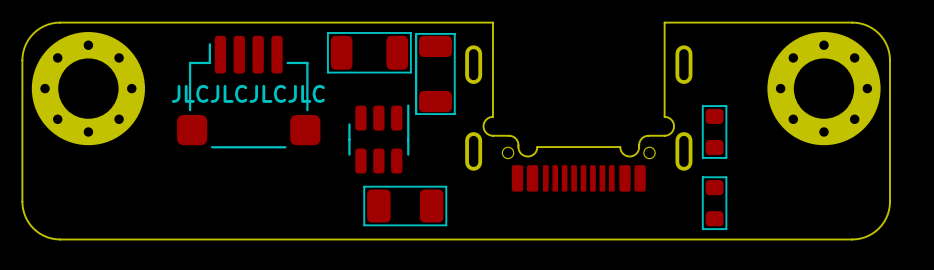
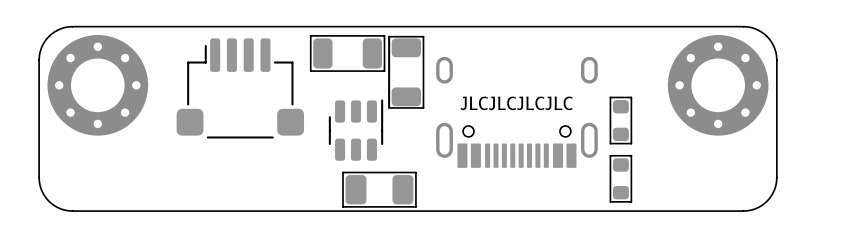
board edge: none -> (457, 26) (610, 26)
board edge: (814, 22) (852, 22) (864, 24) (878, 33) (889, 51) (889, 206) (886, 218) (878, 228) (860, 238) (60, 239) (43, 235) (30, 225) (23, 210) (22, 192) -> (743, 26) (754, 28) (767, 36) (773, 45) (776, 60) (776, 185) (767, 201) (750, 210) (72, 211) (58, 207) (48, 201) (42, 192) (39, 177)
part position: (823, 88) -> (718, 85)
drawing position: (248, 93) -> (516, 103)
part: (578, 106) -> none
part: none -> (516, 112)
part: none -> (620, 120)
part: (714, 131) -> none
part: none -> (620, 178)
part: (714, 203) -> none

